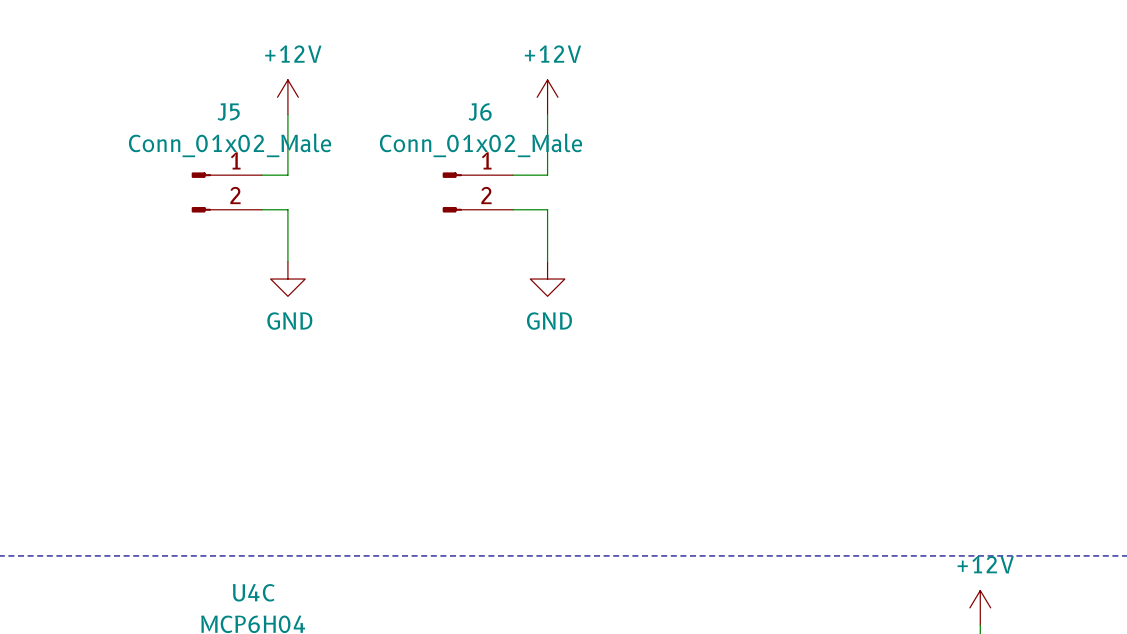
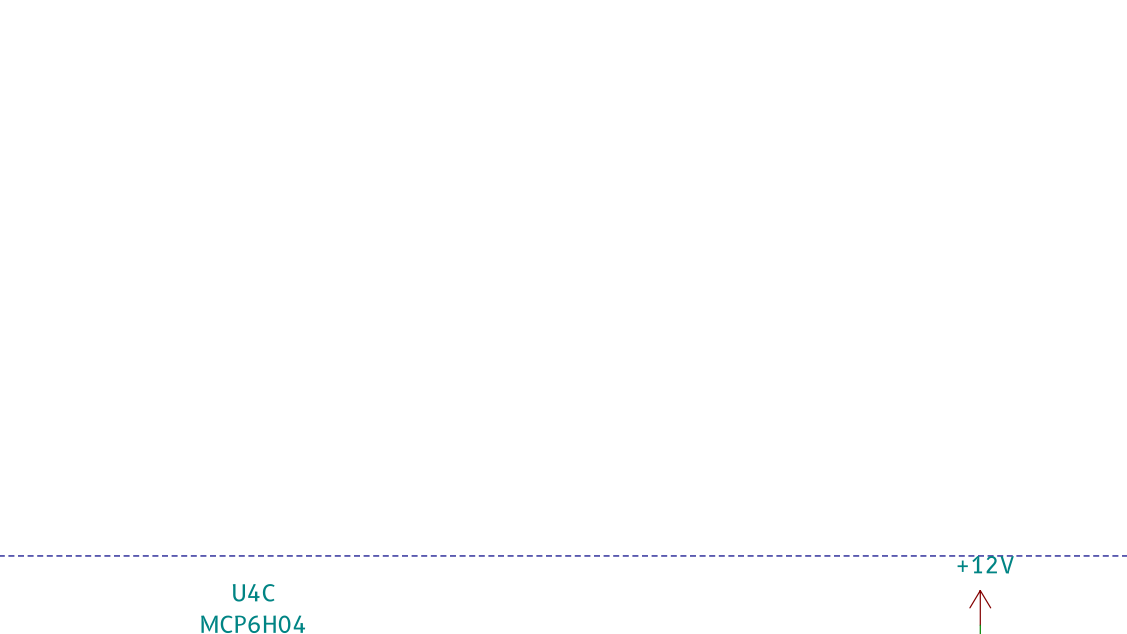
power symbol: +12V (287, 97) -> none
power symbol: +12V (547, 97) -> none
wire: (287, 114) (287, 175) (261, 175) -> none
wire: (547, 114) (547, 175) (512, 175) -> none
J5: Conn_01x02_Male (226, 192) -> none
J6: Conn_01x02_Male (477, 192) -> none
wire: (261, 209) (287, 209) (287, 261) -> none
wire: (512, 209) (547, 209) (547, 261) -> none
power symbol: GND (287, 279) -> none
power symbol: GND (547, 279) -> none

